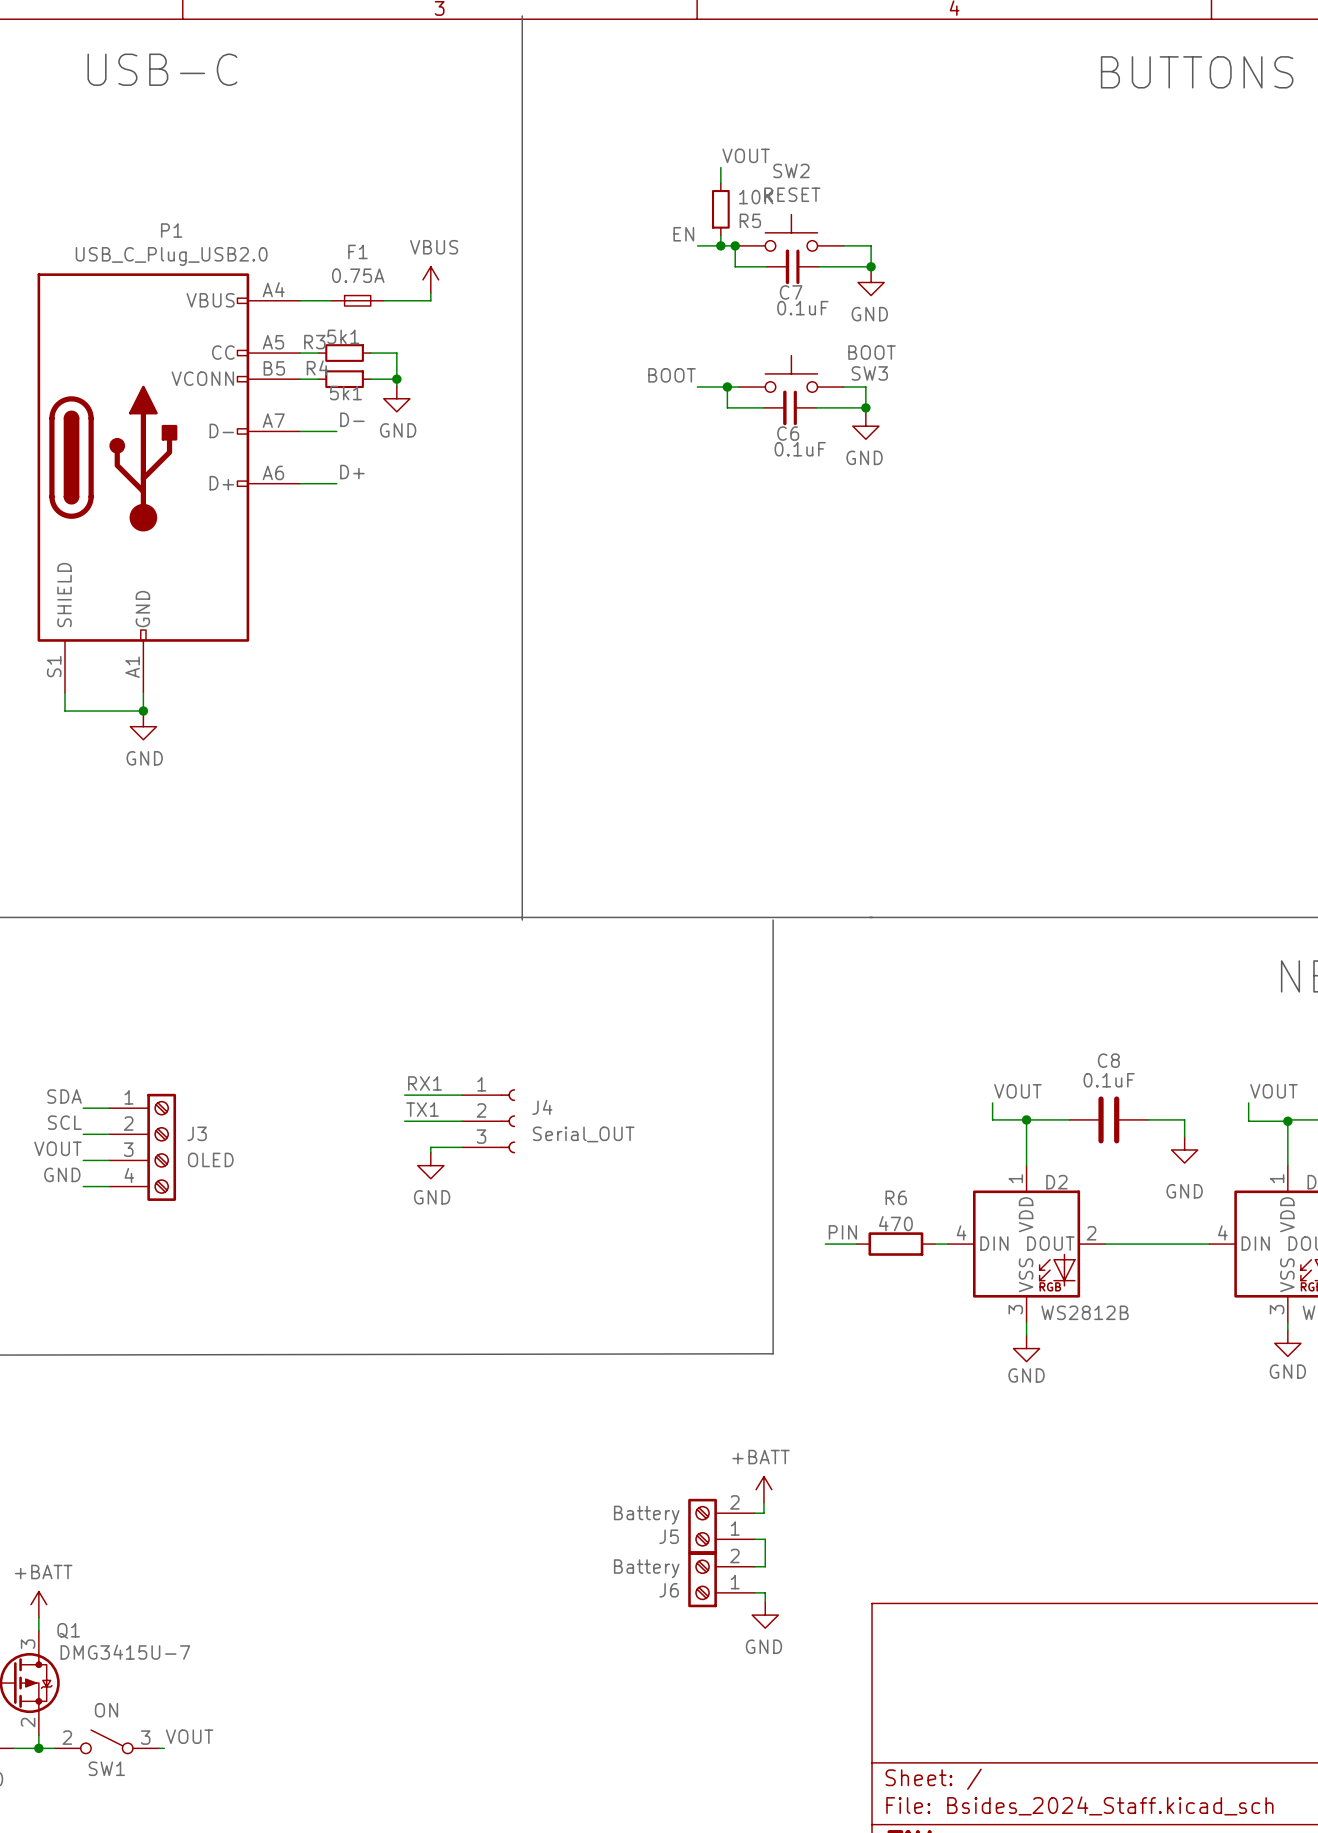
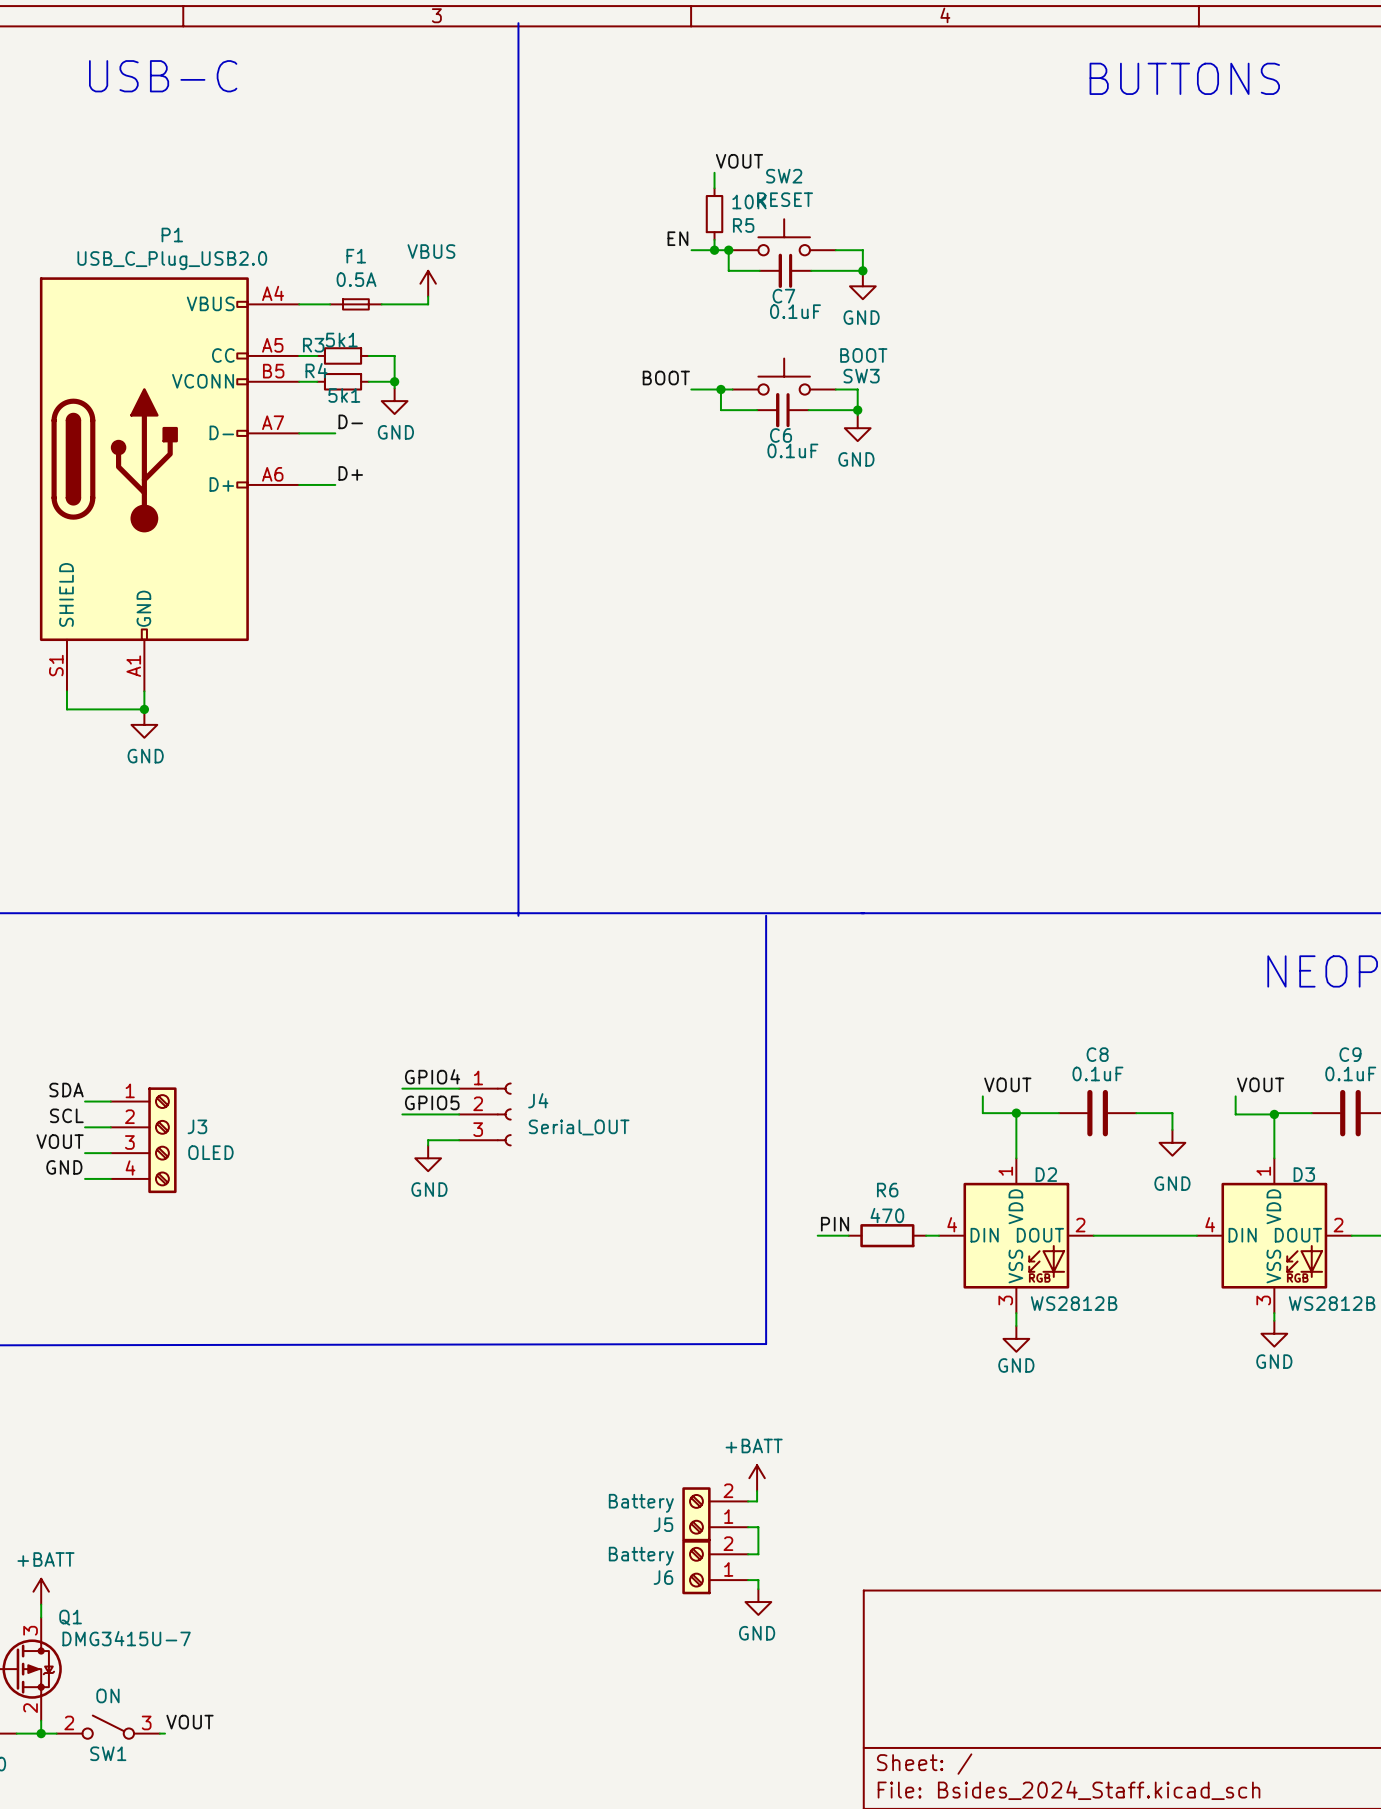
F1 value: 0.75A (358, 275) -> 0.5A (356, 279)
label: RX1 (424, 1083) -> GPIO4 (432, 1076)
label: TX1 (422, 1109) -> GPIO5 (432, 1102)

